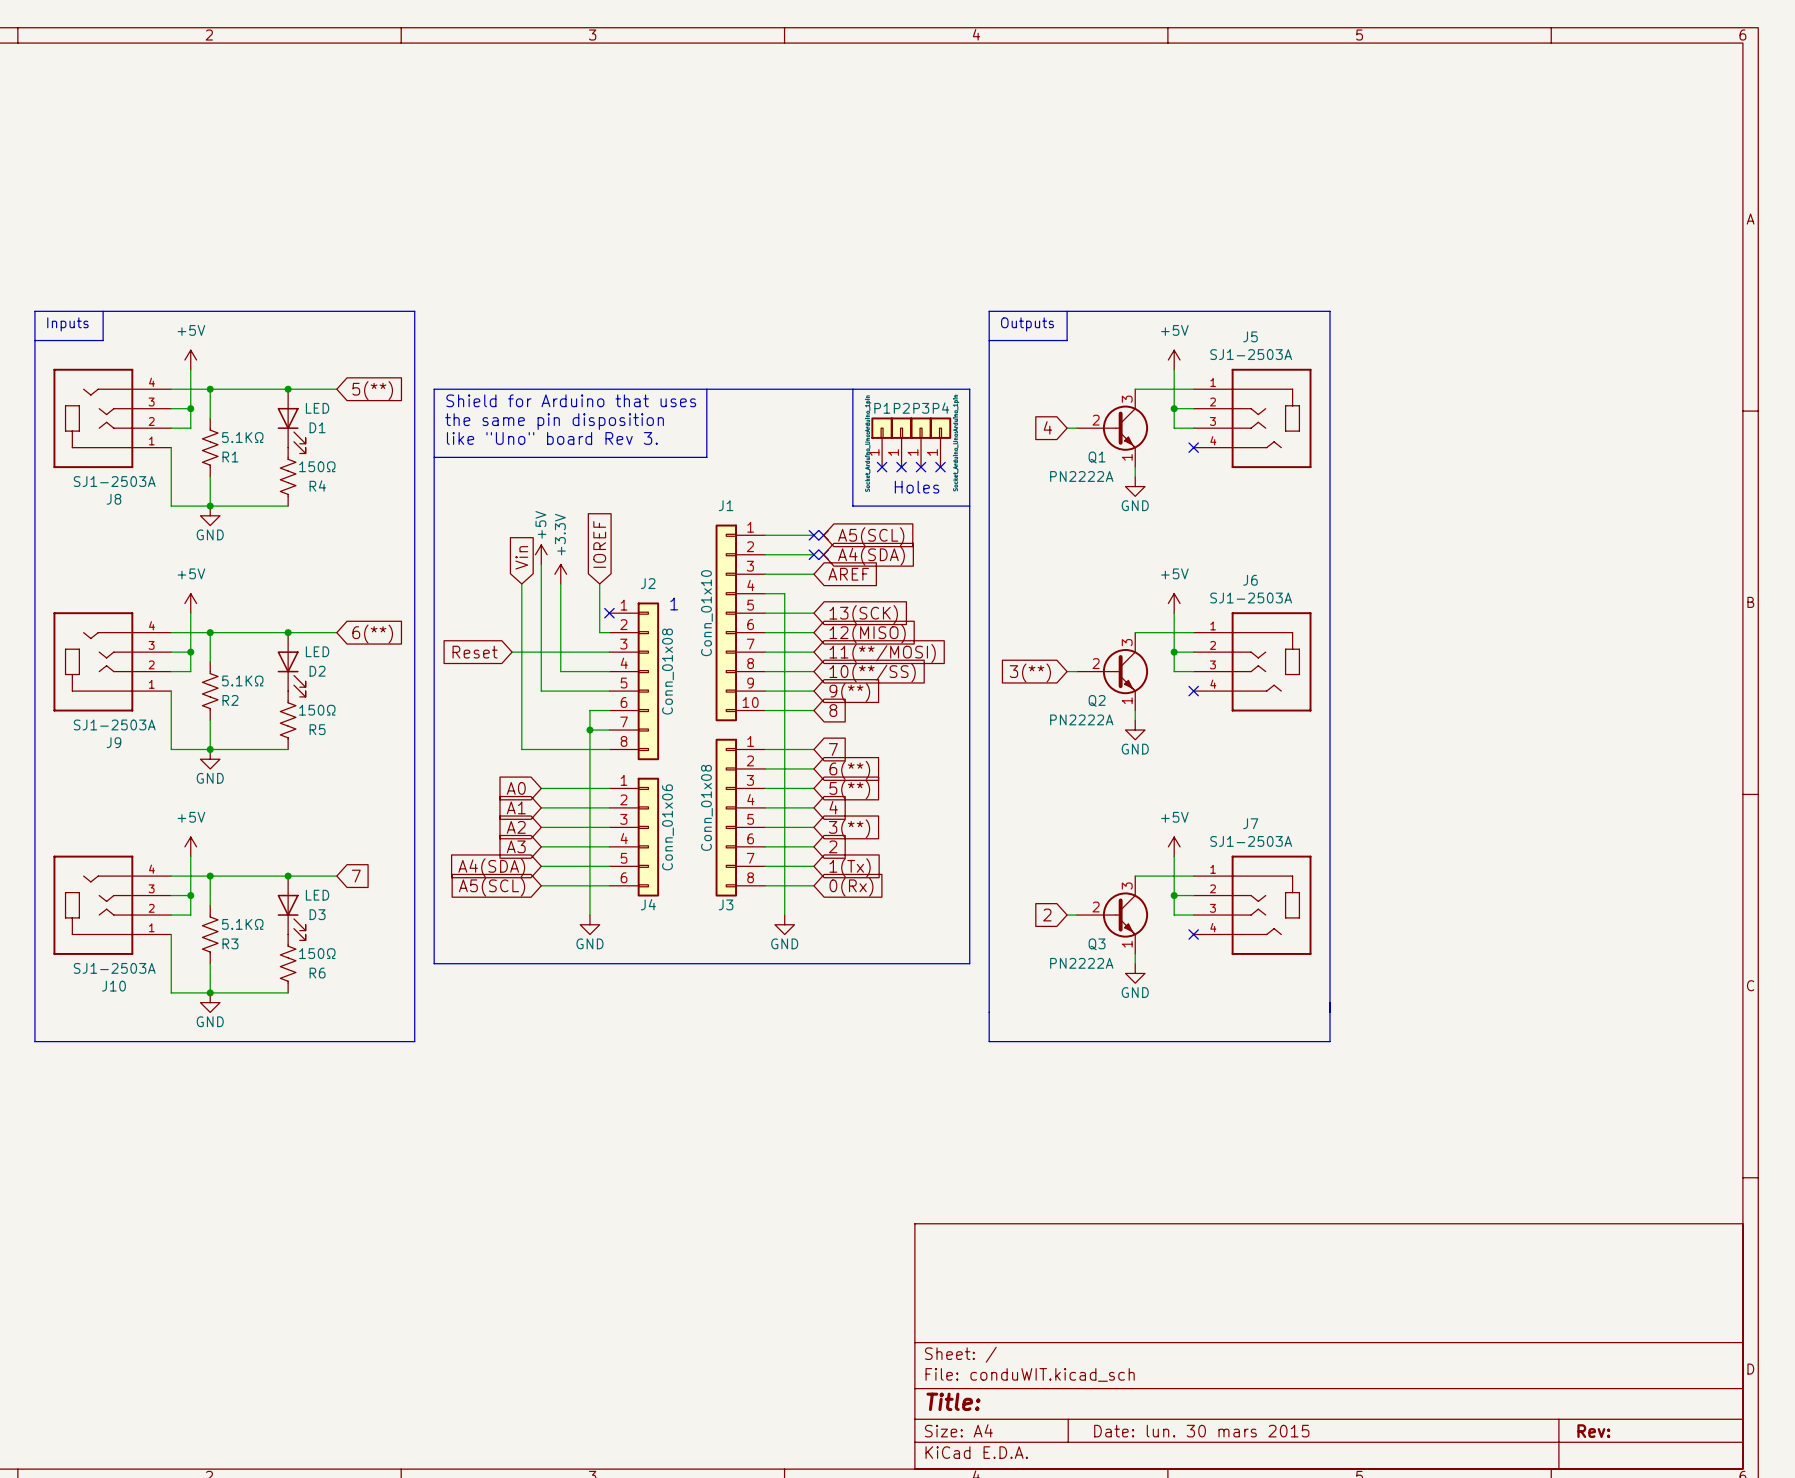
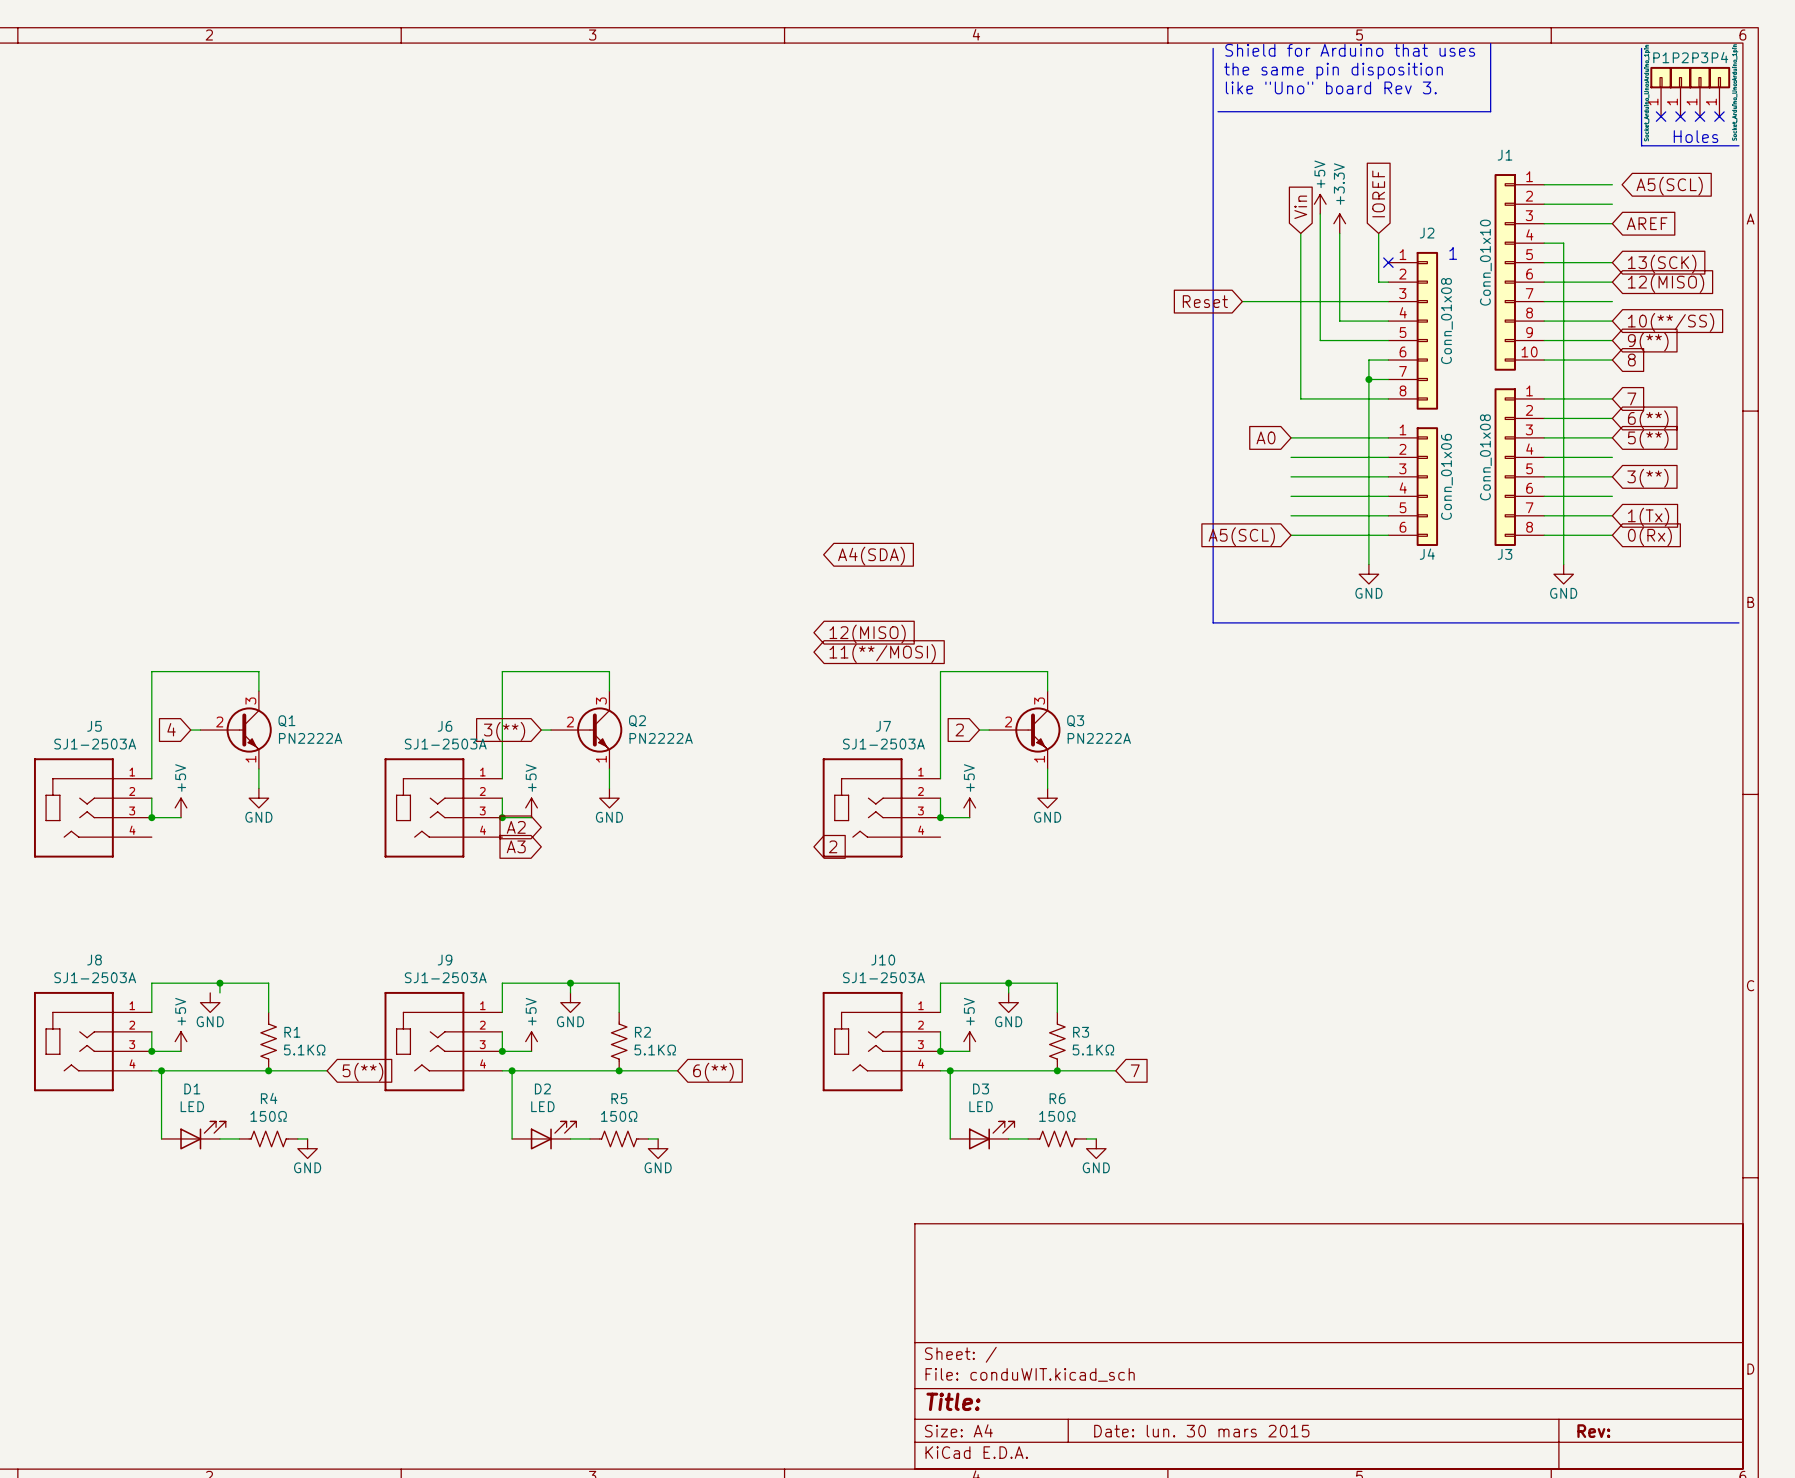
line: none -> (1490, 43) (1490, 111) (1218, 111)
line: none -> (1213, 48) (1213, 622) (1738, 622)
line: none -> (1641, 48) (1641, 145) (1738, 145)
text: none -> Shield for Arduino that uses (1350, 50)
text: none -> the same pin disposition (1333, 71)
text: none -> like "Uno" board Rev 3. (1331, 87)
no-connect mark: none -> (1661, 116)
no-connect mark: none -> (1680, 116)
no-connect mark: none -> (1699, 116)
no-connect mark: none -> (1719, 116)
text: none -> Holes (1696, 136)
wire: none -> (1544, 184) (1612, 184)
global label: none -> A5(SCL) (1669, 186)
global label: none -> IOREF (1378, 193)
power symbol: none -> +5V (1320, 204)
wire: none -> (1544, 204) (1612, 204)
global label: none -> Vin (1300, 207)
wire: none -> (1320, 213) (1320, 340) (1388, 340)
power symbol: none -> +3.3V (1339, 223)
wire: none -> (1544, 223) (1612, 223)
global label: none -> AREF (1647, 223)
wire: none -> (1300, 233) (1300, 398) (1388, 398)
wire: none -> (1339, 233) (1339, 321) (1388, 321)
wire: none -> (1378, 233) (1378, 282) (1388, 282)
wire: none -> (1544, 243) (1563, 243) (1563, 564)
text: none -> 1 (1453, 253)
no-connect mark: none -> (1388, 262)
wire: none -> (1544, 262) (1612, 262)
global label: none -> 13(SCK) (1662, 264)
wire: none -> (1544, 282) (1612, 282)
global label: none -> 12(MISO) (1666, 283)
global label: none -> Reset (1205, 301)
wire: none -> (1242, 301) (1388, 301)
wire: none -> (1544, 301) (1612, 301)
line: (34, 311) (414, 311) (414, 1041) (34, 1041) (34, 311) -> none
line: (103, 311) (103, 340) (34, 340) -> none
line: (989, 311) (1329, 311) (1329, 1041) (989, 1041) (989, 311) -> none
line: (1067, 311) (1067, 340) (989, 340) -> none
wire: none -> (1544, 321) (1612, 321)
global label: none -> 10(**/SS) (1671, 322)
text: Inputs (67, 324) -> none
text: Outputs (1027, 324) -> none
wire: none -> (1544, 340) (1612, 340)
global label: none -> 9(**) (1648, 341)
power symbol: +5V (190, 360) -> none
power symbol: +5V (1174, 360) -> none
wire: none -> (1388, 360) (1368, 360) (1368, 564)
wire: none -> (1544, 360) (1612, 360)
global label: none -> 8 (1631, 360)
wire: (190, 369) (190, 428) (171, 428) -> none
wire: (1174, 369) (1174, 428) (1193, 428) -> none
wire: none -> (1368, 379) (1388, 379)
junction: none -> (1368, 379)
wire: (171, 389) (336, 389) -> none
wire: (210, 389) (210, 418) -> none
junction: (210, 389) -> none
junction: (288, 389) -> none
line: (434, 389) (434, 963) (969, 963) (969, 389) (434, 389) -> none
line: (706, 389) (706, 457) (434, 457) -> none
line: (852, 389) (852, 506) (969, 506) -> none
wire: (1135, 389) (1193, 389) -> none
global label: 5(**) (372, 390) -> none
wire: none -> (1544, 398) (1612, 398)
global label: none -> 7 (1631, 398)
text: Shield for Arduino that uses (571, 400) -> none
wire: (171, 408) (190, 408) -> none
junction: (190, 408) -> none
wire: (1174, 408) (1193, 408) -> none
junction: (1174, 408) -> none
J8 flip: as is (93, 418) -> up-down (73, 1041)
J8 position: (112, 418) -> (92, 1041)
J5 position: (1252, 418) -> (92, 807)
J5 flip: as is (1271, 418) -> left-right (73, 807)
wire: none -> (1544, 418) (1612, 418)
global label: none -> 6(**) (1648, 419)
D1 position: (291, 421) -> (193, 1135)
text: the same pin disposition (554, 421) -> none
D1 name position: D1 (317, 427) -> D1 (192, 1088)
global label: 4 (1047, 427) -> none
wire: (1067, 428) (1076, 428) -> none
Q1 position: (1112, 428) -> (236, 730)
D1 rotation: 0° (291, 430) -> 90° counterclockwise (203, 1135)
R1 value position: 5.1KΩ (242, 437) -> 5.1KΩ (304, 1050)
global label: none -> A0 (1265, 437)
wire: none -> (1291, 437) (1388, 437)
wire: none -> (1544, 437) (1612, 437)
text: like "Uno" board Rev 3. (552, 438) -> none
global label: none -> 5(**) (1648, 439)
P1 position: (882, 442) -> (1661, 91)
P2 position: (901, 442) -> (1680, 91)
P3 position: (921, 442) -> (1699, 91)
P4 position: (940, 442) -> (1719, 91)
wire: (171, 447) (171, 506) (288, 506) -> none
R1 position: (210, 447) -> (268, 1041)
no-connect mark: (1193, 447) -> none
R1 name position: R1 (230, 457) -> R1 (292, 1032)
Q1 name position: Q1 (1097, 457) -> Q1 (286, 721)
wire: none -> (1291, 457) (1388, 457)
wire: none -> (1544, 457) (1612, 457)
R4 value position: 150Ω (317, 466) -> 150Ω (268, 1116)
no-connect mark: (882, 467) -> none
no-connect mark: (901, 467) -> none
no-connect mark: (921, 467) -> none
no-connect mark: (940, 467) -> none
wire: (1135, 467) (1135, 476) -> none
wire: (210, 476) (210, 506) -> none
R4 rotation: 0° (288, 476) -> 90° clockwise (268, 1138)
R4 position: (288, 476) -> (268, 1138)
Q1 value position: PN2222A (1081, 476) -> PN2222A (310, 738)
wire: none -> (1291, 476) (1388, 476)
wire: none -> (1544, 476) (1612, 476)
global label: none -> 3(**) (1647, 478)
R4 name position: R4 (317, 486) -> R4 (269, 1098)
power symbol: GND (1135, 486) -> none
text: Holes (917, 487) -> none
wire: none -> (1291, 496) (1388, 496)
wire: none -> (1544, 496) (1612, 496)
junction: (210, 506) -> none
power symbol: GND (210, 515) -> none
wire: none -> (1291, 515) (1388, 515)
wire: none -> (1544, 515) (1612, 515)
global label: none -> 1(Tx) (1648, 517)
wire: (765, 535) (813, 535) -> none
no-connect mark: (813, 535) -> none
no-connect mark: (823, 535) -> none
wire: none -> (1291, 535) (1388, 535)
wire: none -> (1544, 535) (1612, 535)
global label: A5(SCL) (871, 536) -> none
global label: none -> A5(SCL) (1241, 536)
global label: none -> 0(Rx) (1649, 536)
global label: IOREF (599, 544) -> none
power symbol: +5V (541, 554) -> none
wire: (765, 554) (813, 554) -> none
no-connect mark: (813, 554) -> none
no-connect mark: (823, 554) -> none
global label: Vin (521, 557) -> none
wire: (541, 564) (541, 691) (609, 691) -> (609, 671) (609, 691)
power symbol: +3.3V (560, 574) -> none
wire: (765, 574) (813, 574) -> none
global label: AREF (848, 574) -> none
power symbol: none -> GND (1368, 574)
power symbol: none -> GND (1563, 574)
wire: (521, 583) (521, 749) (609, 749) -> none
wire: (560, 583) (560, 671) -> (502, 778) (502, 671) (560, 671)
wire: (599, 583) (599, 632) (609, 632) -> none
wire: (765, 593) (784, 593) (784, 915) -> none
power symbol: +5V (190, 603) -> none
text: 1 (674, 603) -> none
power symbol: +5V (1174, 603) -> none
wire: (190, 613) (190, 671) -> (258, 691) (258, 671) (190, 671)
no-connect mark: (609, 613) -> none
wire: (765, 613) (813, 613) -> none
wire: (1174, 613) (1174, 671) (1193, 671) -> none
global label: 13(SCK) (863, 614) -> none
J1 position: (740, 622) -> (1519, 272)
wire: (171, 632) (336, 632) -> none
wire: (210, 632) (210, 661) -> none
junction: (210, 632) -> none
junction: (288, 632) -> none
wire: (765, 632) (813, 632) -> none
wire: (1135, 632) (1193, 632) -> none
global label: 6(**) (372, 634) -> none
wire: (171, 652) (190, 652) -> none
junction: (190, 652) -> none
global label: Reset (475, 652) -> none
wire: (512, 652) (609, 652) -> none
wire: (765, 652) (813, 652) -> none
wire: (1174, 652) (1193, 652) -> none
junction: (1174, 652) -> none
J9 flip: as is (93, 661) -> up-down (424, 1041)
J9 position: (112, 661) -> (443, 1041)
J6 position: (1252, 661) -> (443, 807)
J6 flip: as is (1271, 661) -> left-right (424, 807)
D2 position: (291, 664) -> (544, 1135)
wire: none -> (171, 671) (151, 671) (151, 778)
D2 name position: D2 (317, 671) -> D2 (542, 1088)
wire: (765, 671) (813, 671) -> none
wire: (1067, 671) (1076, 671) -> (979, 730) (989, 730)
Q2 position: (1112, 671) -> (586, 730)
global label: 10(**/SS) (872, 672) -> none
global label: 3(**) (1030, 672) -> none
D2 rotation: 0° (291, 674) -> 90° counterclockwise (553, 1135)
R2 value position: 5.1KΩ (242, 680) -> 5.1KΩ (655, 1050)
J2 position: (634, 681) -> (1413, 330)
wire: (171, 691) (171, 749) (288, 749) -> none
R2 position: (210, 691) -> (619, 1041)
wire: (765, 691) (813, 691) -> none
wire: none -> (1047, 691) (1047, 671) (940, 671) (940, 778)
no-connect mark: (1193, 691) -> none
global label: 9(**) (849, 692) -> none
R2 name position: R2 (230, 700) -> R2 (642, 1032)
Q2 name position: Q2 (1097, 700) -> Q2 (637, 721)
R5 value position: 150Ω (317, 710) -> 150Ω (619, 1116)
wire: (609, 710) (589, 710) (589, 915) -> none
wire: (765, 710) (813, 710) -> none
global label: 8 (833, 710) -> none
wire: (1135, 710) (1135, 720) -> none
Q2 value position: PN2222A (1081, 719) -> PN2222A (661, 738)
wire: (210, 720) (210, 749) -> none
R5 rotation: 0° (288, 720) -> 90° clockwise (619, 1138)
R5 position: (288, 720) -> (619, 1138)
global label: none -> 4 (171, 729)
R5 name position: R5 (317, 729) -> R5 (619, 1098)
wire: none -> (190, 730) (200, 730)
wire: none -> (541, 730) (551, 730)
wire: (589, 730) (609, 730) -> none
junction: (589, 730) -> none
global label: none -> 2 (959, 730)
power symbol: GND (1135, 730) -> none
global label: none -> 3(**) (504, 731)
junction: (210, 749) -> none
wire: (765, 749) (813, 749) -> none
global label: 7 (833, 749) -> none
power symbol position: GND (210, 759) -> GND (258, 798)
wire: none -> (258, 768) (258, 788)
wire: (765, 768) (813, 768) -> none
wire: none -> (1047, 768) (1047, 788)
global label: 6(**) (849, 770) -> none
global label: A0 (516, 788) -> none
wire: (541, 788) (609, 788) -> (609, 768) (609, 788)
wire: (765, 788) (813, 788) -> none
global label: 5(**) (849, 789) -> none
wire: none -> (151, 798) (151, 817) (181, 817)
wire: none -> (502, 798) (502, 817) (531, 817)
power symbol: none -> GND (609, 798)
wire: none -> (940, 798) (940, 817) (969, 817)
power symbol: none -> GND (1047, 798)
global label: A1 (516, 807) -> none
power symbol: none -> +5V (531, 807)
wire: (541, 807) (609, 807) -> none
wire: (765, 807) (813, 807) -> none
global label: 4 (833, 807) -> none
power symbol: none -> +5V (969, 807)
junction: none -> (151, 817)
power symbol text rotation: 0° (191, 817) -> 90° counterclockwise (180, 778)
junction: none -> (502, 817)
J3 position: (740, 817) -> (1519, 467)
junction: none -> (940, 817)
wire: (541, 827) (609, 827) -> none
wire: (765, 827) (813, 827) -> none
global label: 3(**) (849, 828) -> none
J4 position: (634, 837) -> (1413, 486)
power symbol position: +5V (190, 846) -> +5V (181, 807)
wire: (541, 846) (609, 846) -> none
wire: (765, 846) (813, 846) -> none
power symbol: +5V (1174, 846) -> none
wire: (190, 856) (190, 915) (171, 915) -> none
wire: (1174, 856) (1174, 915) (1193, 915) -> none
wire: (541, 866) (609, 866) -> none
wire: (765, 866) (813, 866) -> none
global label: A4(SDA) (491, 867) -> none
global label: 1(Tx) (850, 867) -> none
wire: (171, 876) (336, 876) -> none
wire: (210, 876) (210, 905) -> none
junction: (210, 876) -> none
junction: (288, 876) -> none
global label: 7 (356, 876) -> none
wire: (1135, 876) (1193, 876) -> none
wire: (541, 885) (609, 885) -> none
wire: (765, 885) (813, 885) -> none
global label: A5(SCL) (492, 887) -> none
global label: 0(Rx) (851, 887) -> none
wire: (171, 895) (190, 895) -> none
junction: (190, 895) -> none
wire: (1174, 895) (1193, 895) -> none
junction: (1174, 895) -> none
J10 flip: as is (93, 905) -> up-down (862, 1041)
J10 position: (112, 905) -> (881, 1041)
J7 position: (1252, 905) -> (881, 807)
J7 flip: as is (1271, 905) -> left-right (862, 807)
D3 position: (291, 908) -> (982, 1135)
D3 name position: D3 (317, 914) -> D3 (981, 1088)
global label: 2 (1047, 915) -> none
wire: (1067, 915) (1076, 915) -> none
Q3 position: (1112, 915) -> (1024, 730)
D3 rotation: 0° (291, 917) -> 90° counterclockwise (991, 1135)
R3 value position: 5.1KΩ (242, 924) -> 5.1KΩ (1093, 1050)
power symbol: GND (589, 924) -> none
power symbol: GND (784, 924) -> none
wire: (171, 934) (171, 992) (288, 992) -> none
R3 position: (210, 934) -> (1057, 1041)
no-connect mark: (1193, 934) -> none
R3 name position: R3 (230, 943) -> R3 (1081, 1032)
Q3 name position: Q3 (1097, 944) -> Q3 (1075, 721)
R6 value position: 150Ω (317, 953) -> 150Ω (1057, 1116)
wire: (1135, 953) (1135, 963) -> (1008, 983) (1008, 992)
wire: (210, 963) (210, 992) -> none
R6 rotation: 0° (288, 963) -> 90° clockwise (1057, 1138)
R6 position: (288, 963) -> (1057, 1138)
Q3 value position: PN2222A (1081, 963) -> PN2222A (1099, 738)
R6 name position: R6 (317, 973) -> R6 (1057, 1098)
power symbol: GND (1135, 973) -> none
wire: none -> (219, 983) (219, 992)
wire: none -> (570, 983) (570, 992)
junction: none -> (570, 983)
junction: none -> (1008, 983)
junction position: (210, 992) -> (219, 983)
power symbol: none -> GND (570, 1002)
power symbol: none -> GND (1008, 1002)
wire: none -> (151, 1012) (151, 983) (268, 983) (268, 1012)
wire: none -> (502, 1012) (502, 983) (619, 983) (619, 1012)
wire: none -> (940, 1012) (940, 983) (1057, 983) (1057, 1012)
wire: none -> (151, 1031) (151, 1051) (181, 1051)
wire: none -> (502, 1031) (502, 1051) (531, 1051)
wire: none -> (940, 1031) (940, 1051) (969, 1051)
power symbol: none -> +5V (181, 1041)
power symbol: none -> +5V (531, 1041)
power symbol: none -> +5V (969, 1041)
junction: none -> (151, 1051)
junction: none -> (502, 1051)
junction: none -> (940, 1051)
wire: none -> (151, 1070) (327, 1070)
wire: none -> (161, 1070) (161, 1138)
junction: none -> (161, 1070)
junction: none -> (268, 1070)
wire: none -> (502, 1070) (677, 1070)
wire: none -> (512, 1070) (512, 1138)
junction: none -> (512, 1070)
junction: none -> (619, 1070)
wire: none -> (940, 1070) (1115, 1070)
wire: none -> (950, 1070) (950, 1138)
junction: none -> (950, 1070)
junction: none -> (1057, 1070)
global label: none -> 7 (1135, 1070)
global label: none -> 5(**) (362, 1072)
global label: none -> 6(**) (713, 1072)
wire: none -> (219, 1138) (239, 1138)
wire: none -> (297, 1138) (307, 1138)
wire: none -> (570, 1138) (589, 1138)
wire: none -> (648, 1138) (658, 1138)
wire: none -> (1008, 1138) (1028, 1138)
wire: none -> (1086, 1138) (1096, 1138)
power symbol: none -> GND (307, 1148)
power symbol: none -> GND (658, 1148)
power symbol: none -> GND (1096, 1148)

